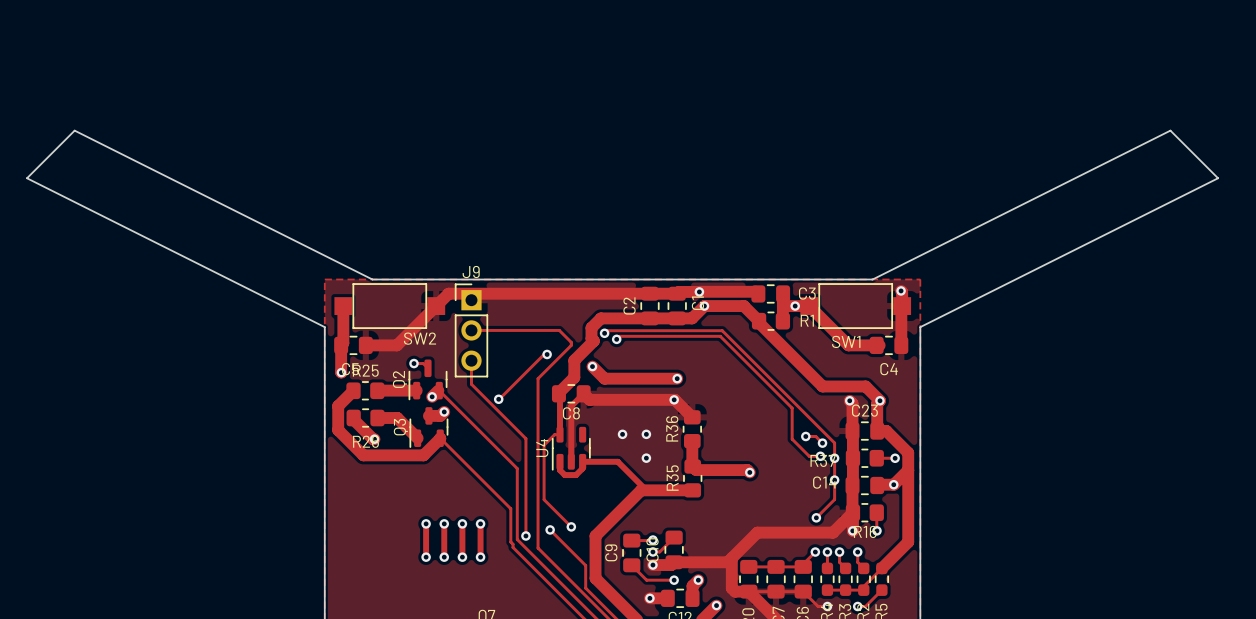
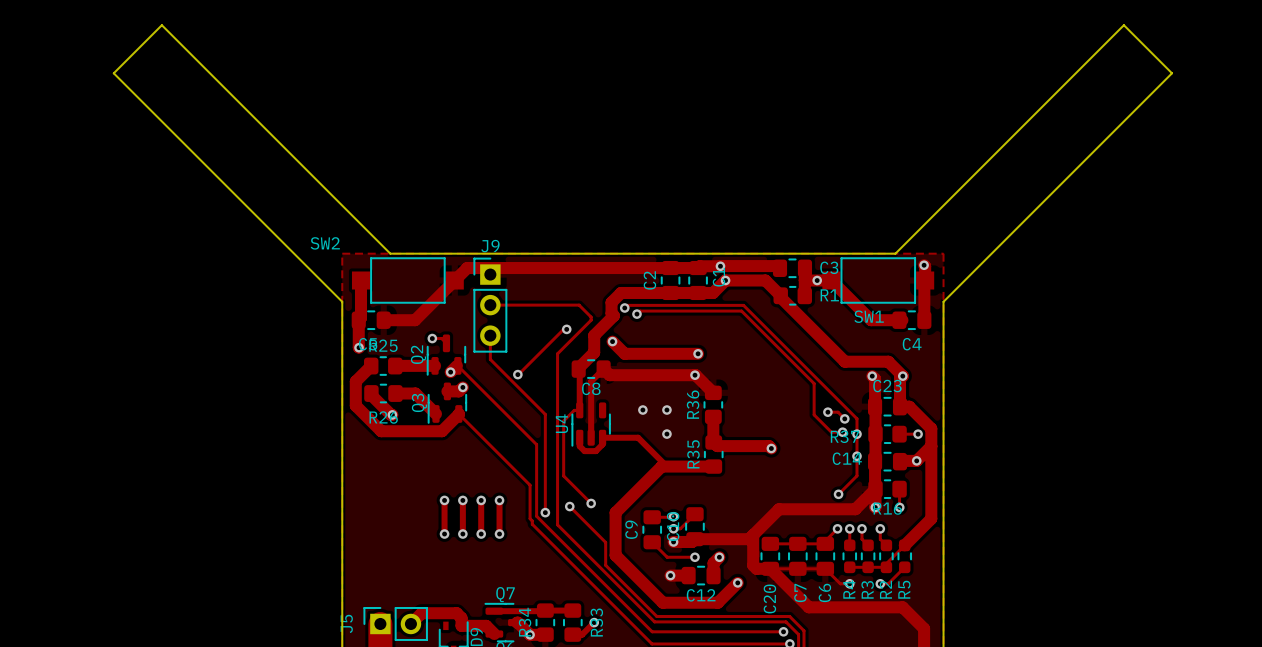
board edge: (372, 279) (74, 130) (27, 178) (324, 327) -> (390, 253) (161, 25) (113, 73) (342, 301)
board edge: (872, 279) (1170, 130) (1218, 178) (920, 327) -> (895, 253) (1123, 25) (1172, 73) (943, 301)
SW2 name position: SW2 (420, 338) -> SW2 (325, 243)

